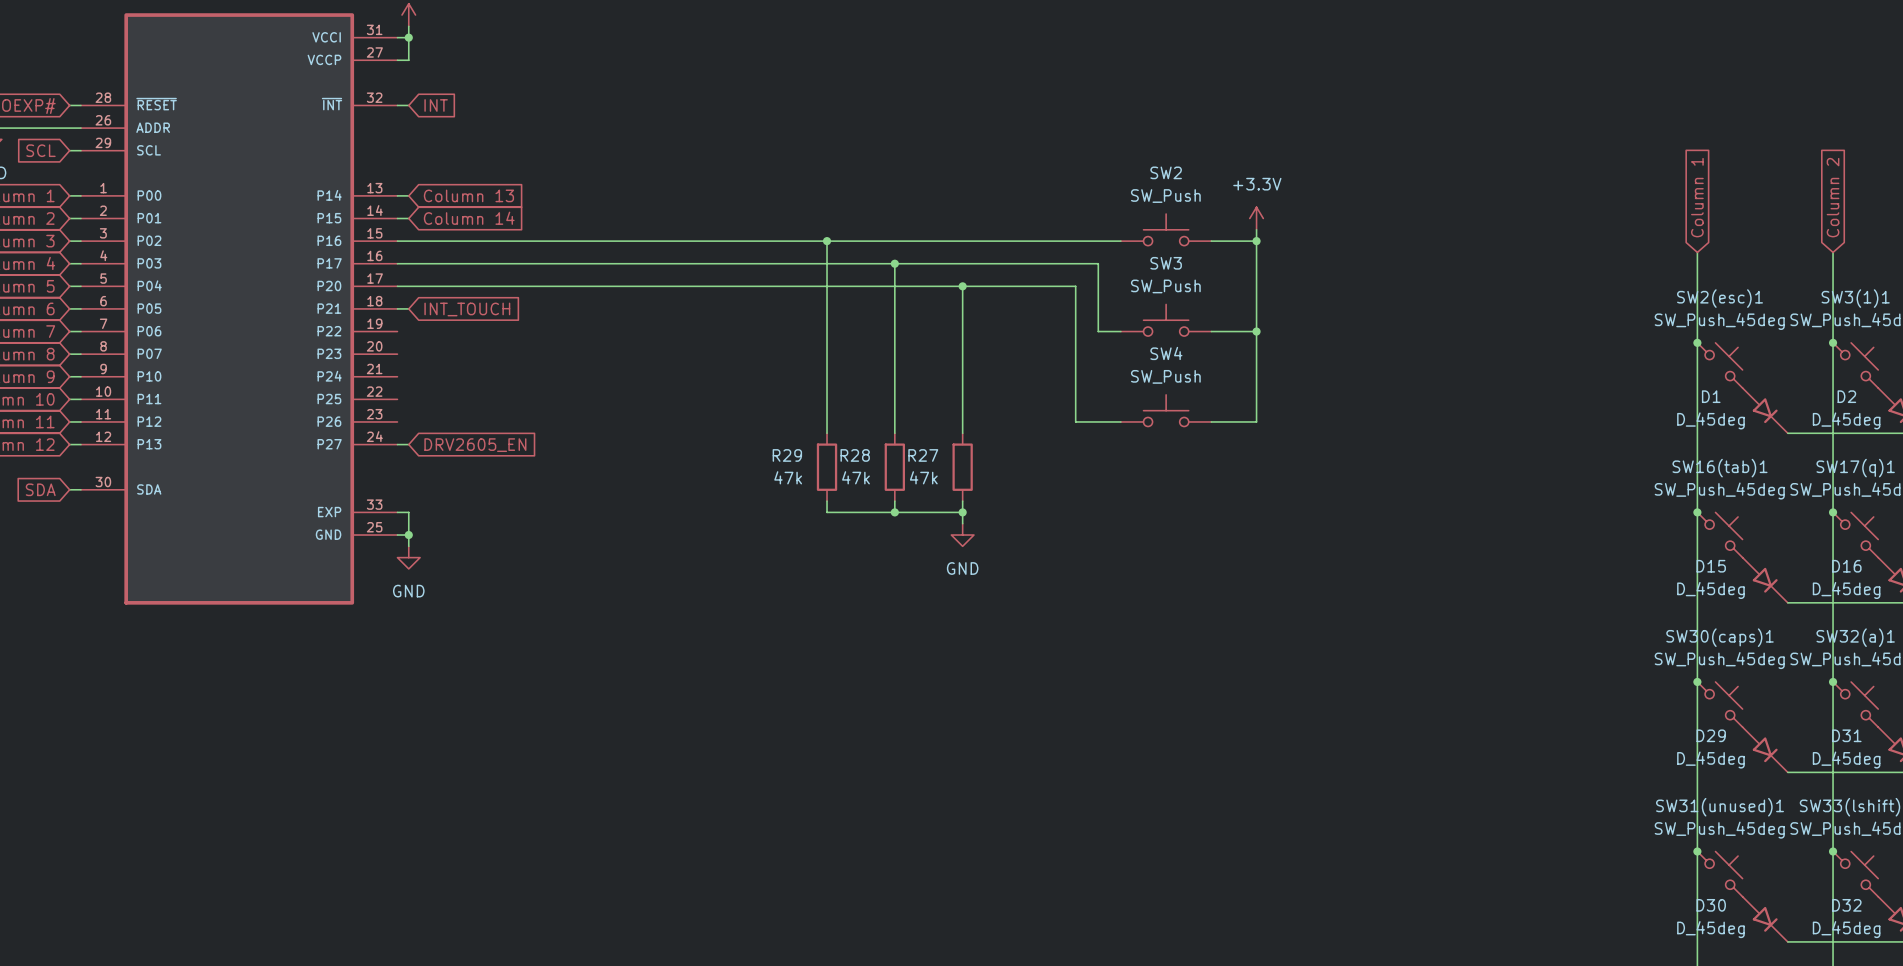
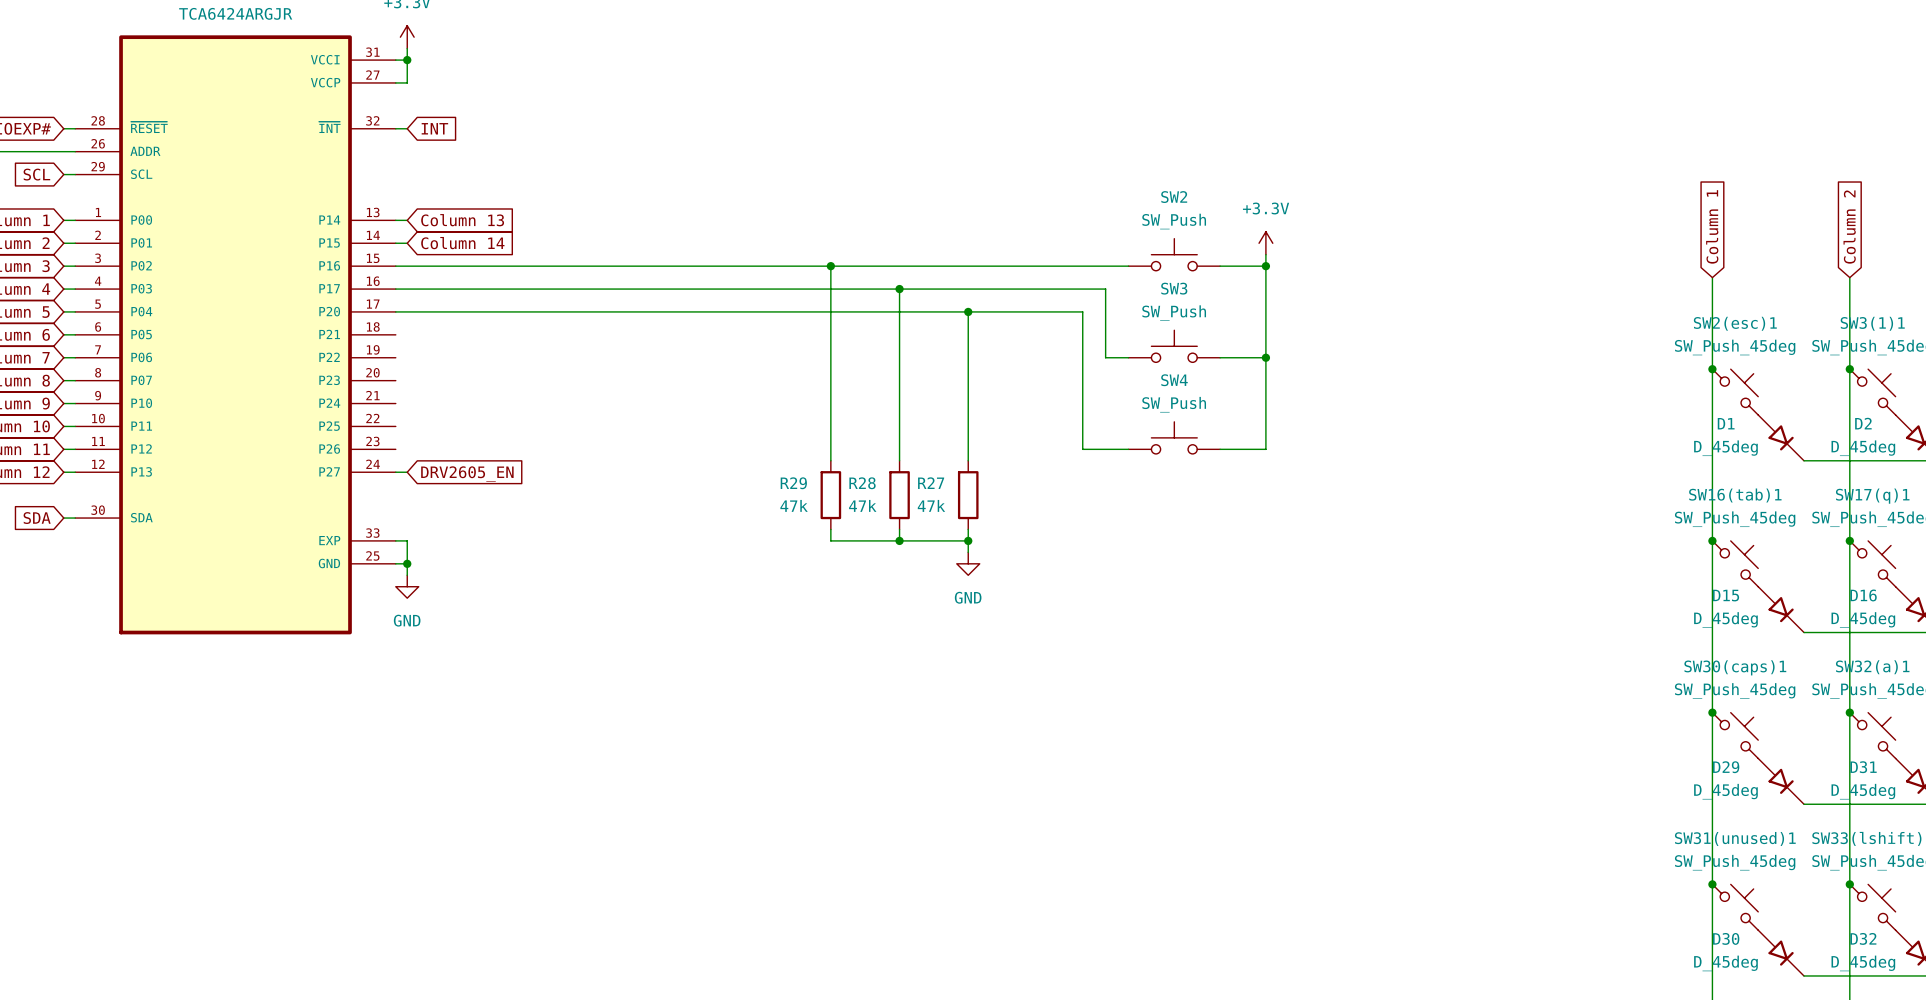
wire: (397, 308) (408, 308) -> none
global label: INT_TOUCH (467, 309) -> none

